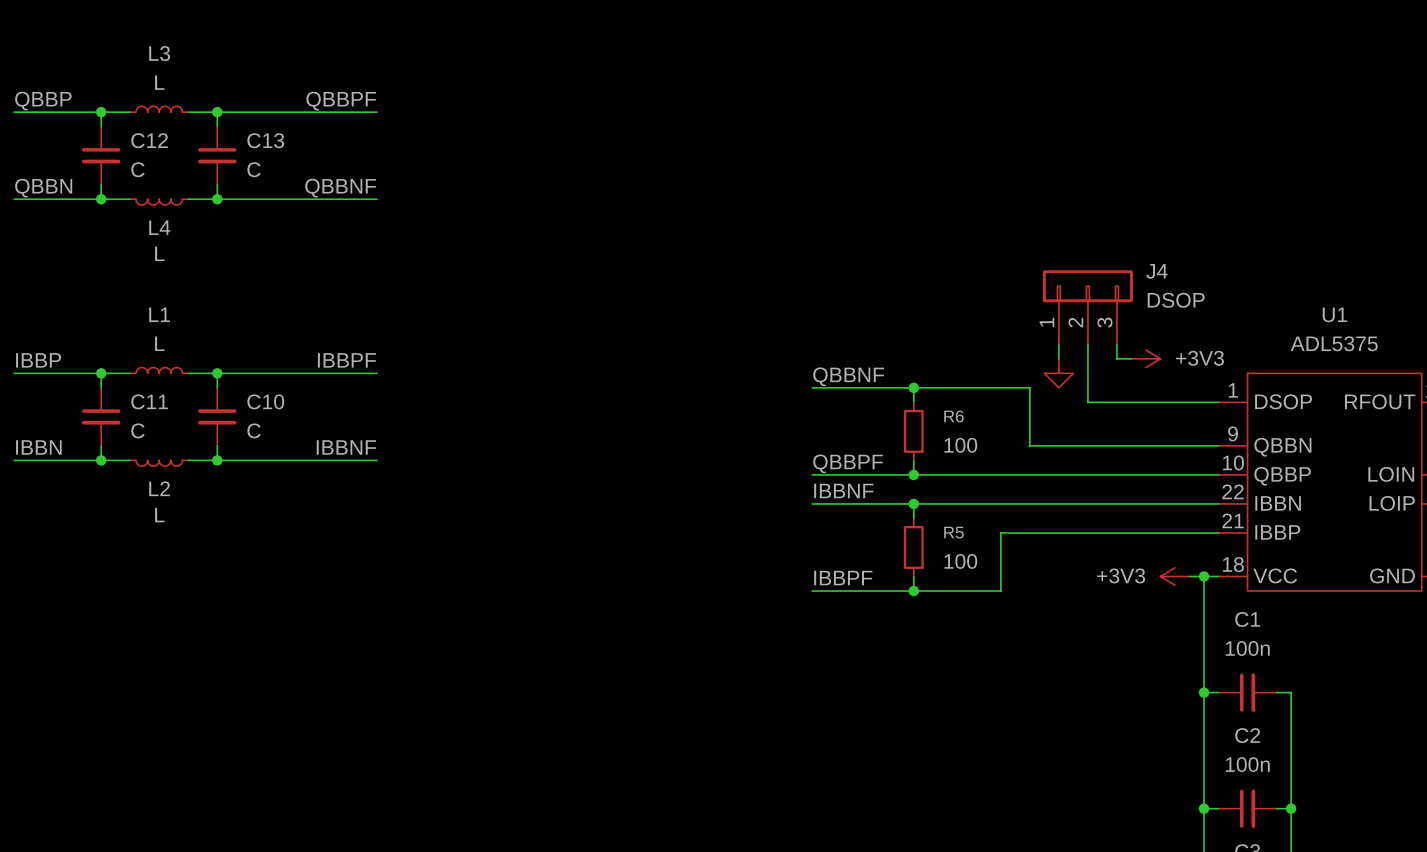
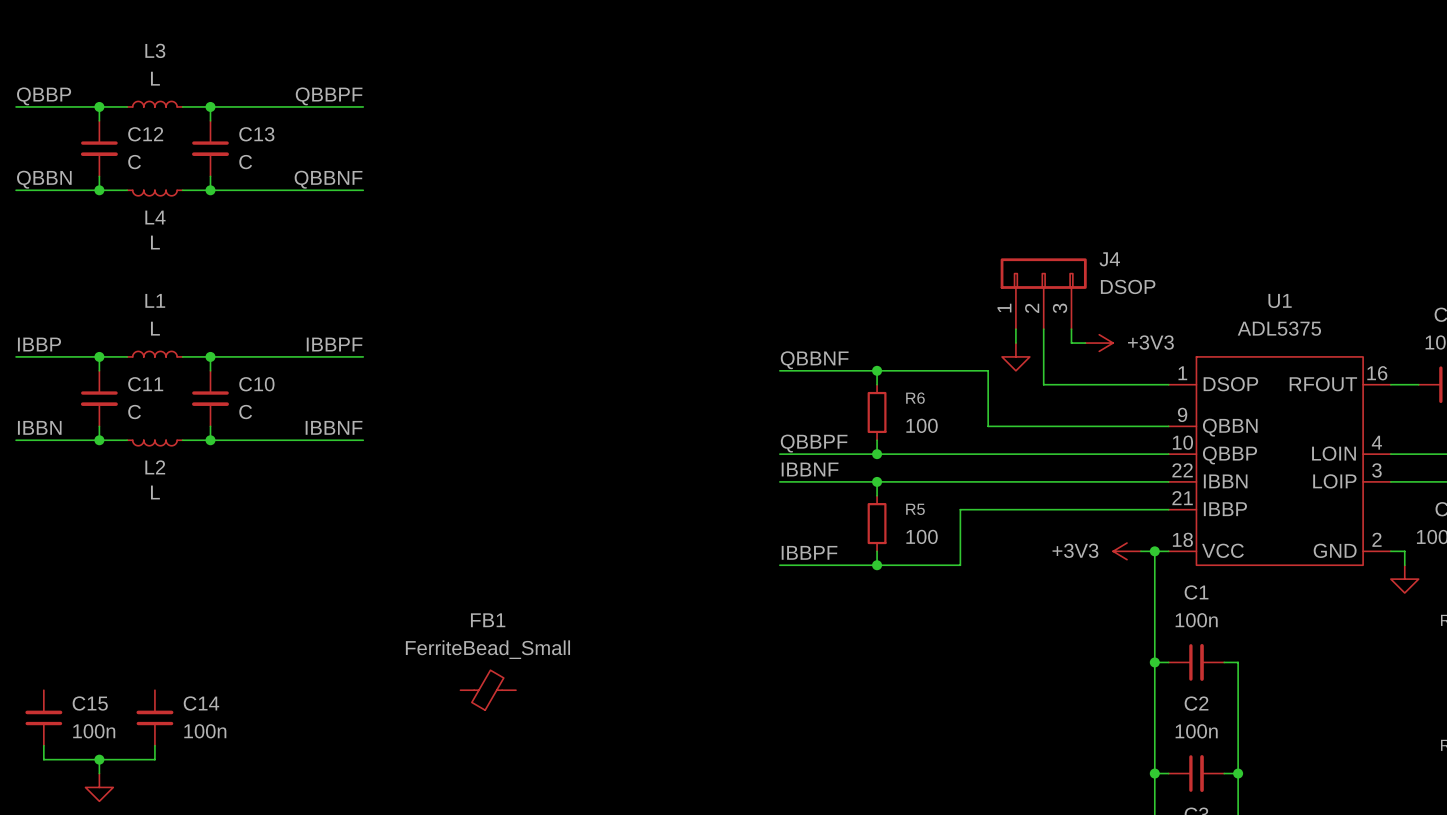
FB1: none -> FerriteBead_Small (488, 690)
C15: none -> 100n (43, 717)
C14: none -> 100n (154, 717)
wire: none -> (43, 745) (43, 759) (154, 759) (154, 745)
wire: none -> (99, 759) (99, 773)
junction: none -> (99, 759)
power symbol: none -> (99, 787)

